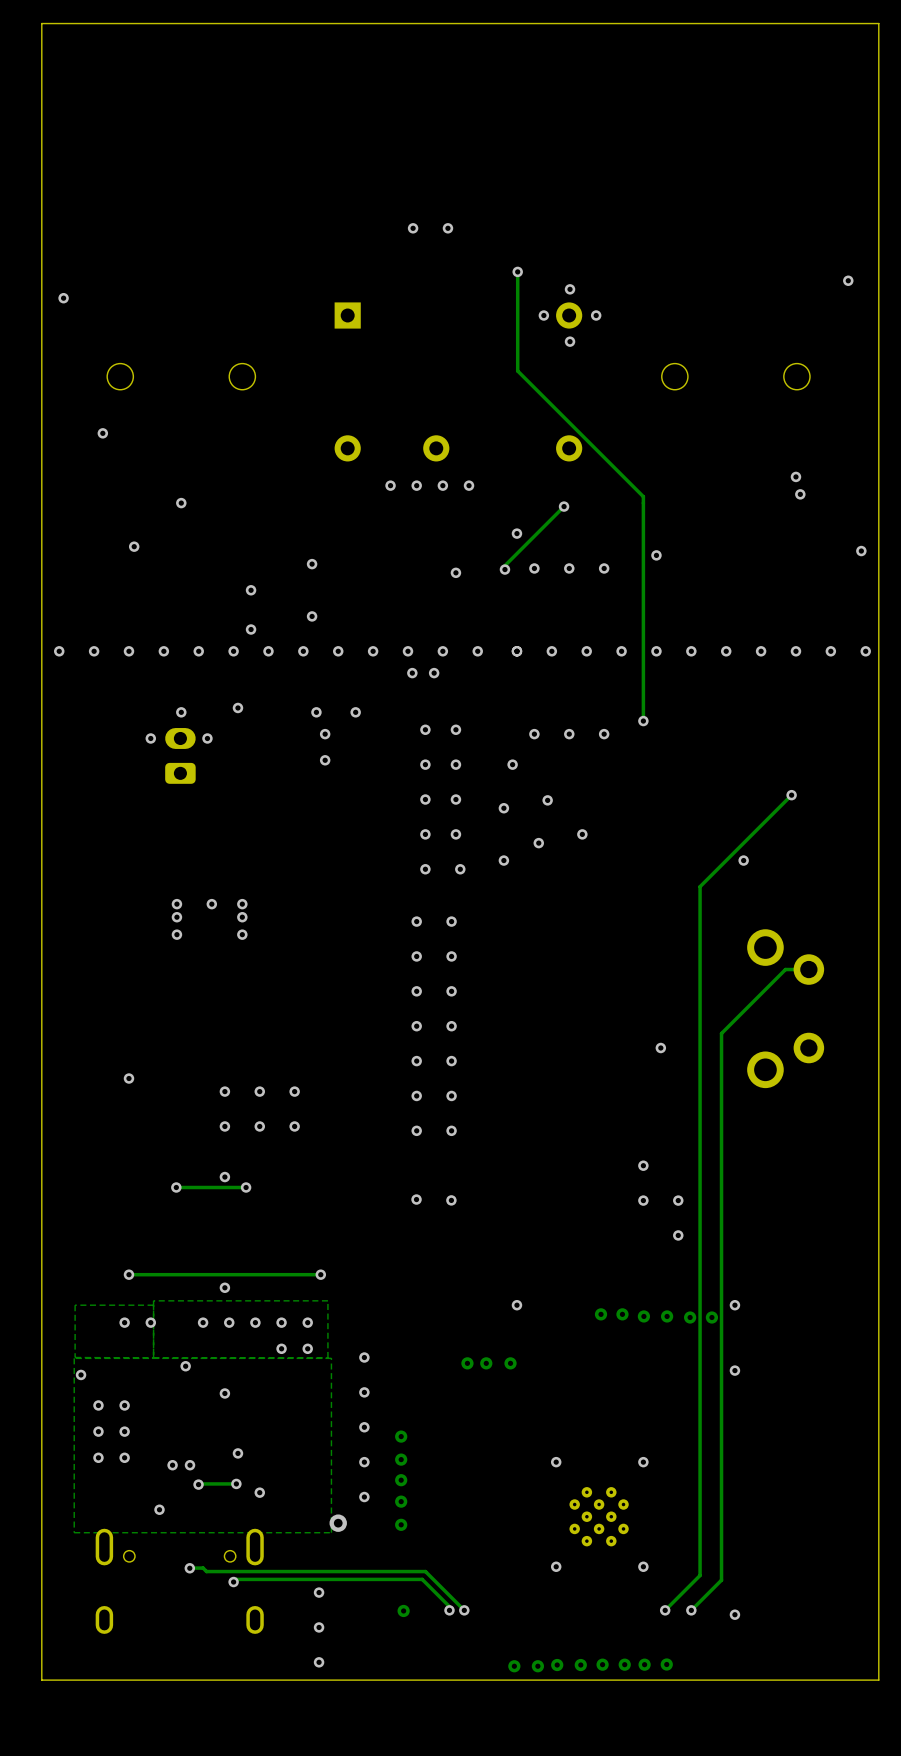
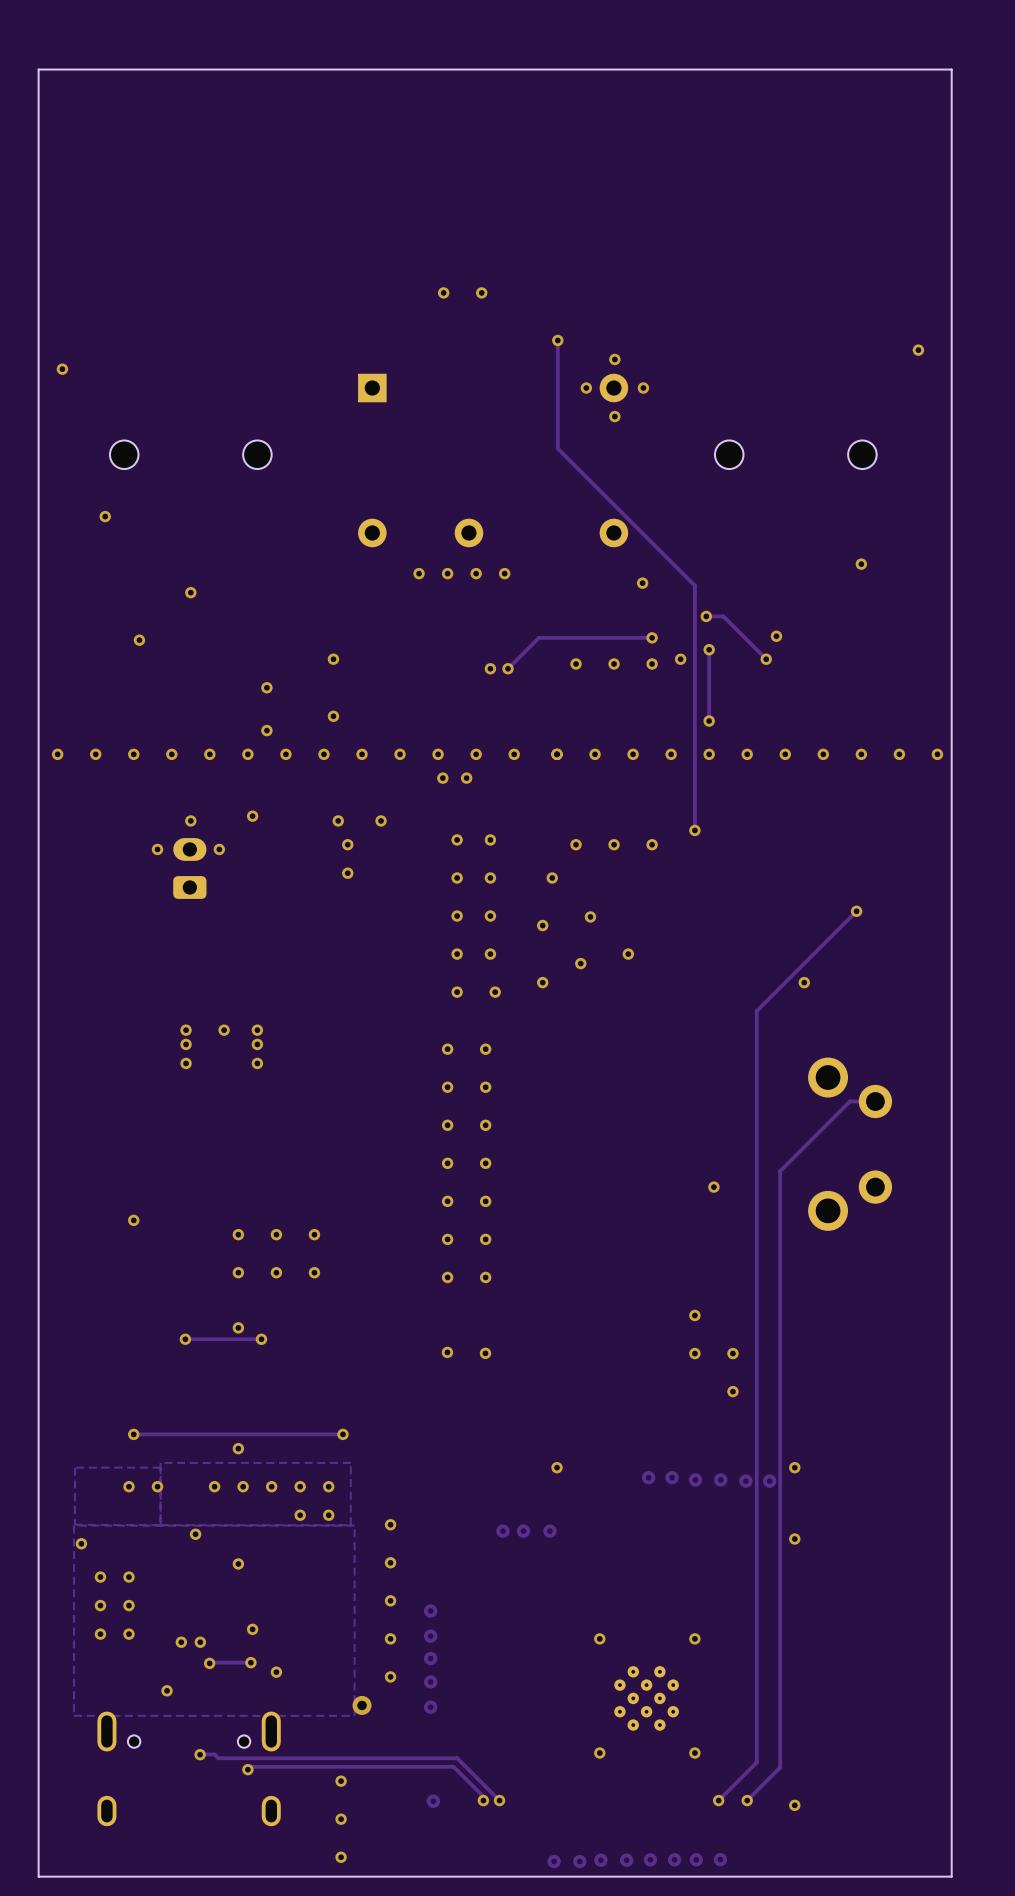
via: none -> (642, 583)
via: (800, 494) -> none
track: (564, 506) (504, 565) (504, 569) -> none
via: (564, 506) -> none
track: none -> (706, 616) (723, 616) (766, 659)
via: none -> (706, 616)
via: (516, 533) -> none
via: none -> (776, 636)
track: none -> (652, 637) (538, 637) (508, 668)
via: none -> (652, 637)
via: (861, 551) -> none
track: none -> (706, 649) (709, 652) (709, 721)
via: none -> (680, 659)
via: none -> (766, 659)
via: (504, 569) -> none
via: none -> (508, 668)
via: none -> (709, 721)

